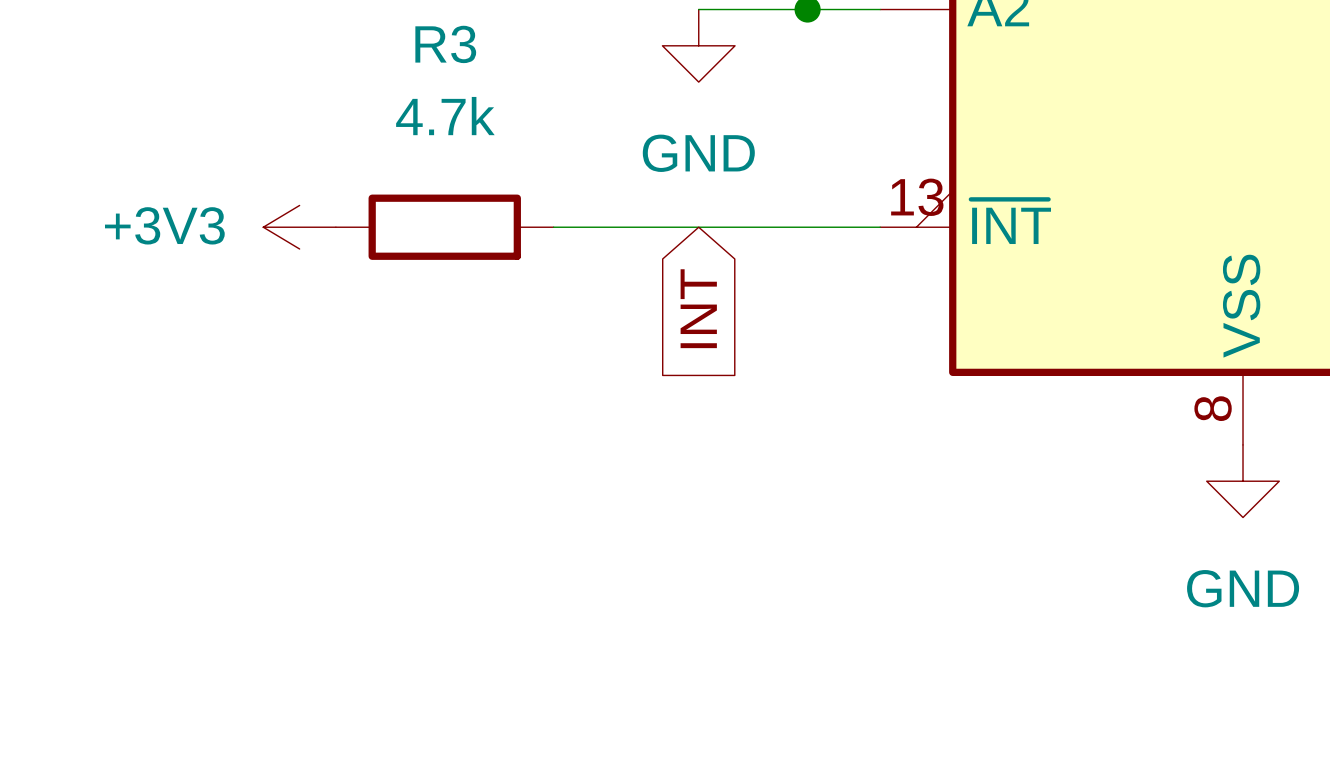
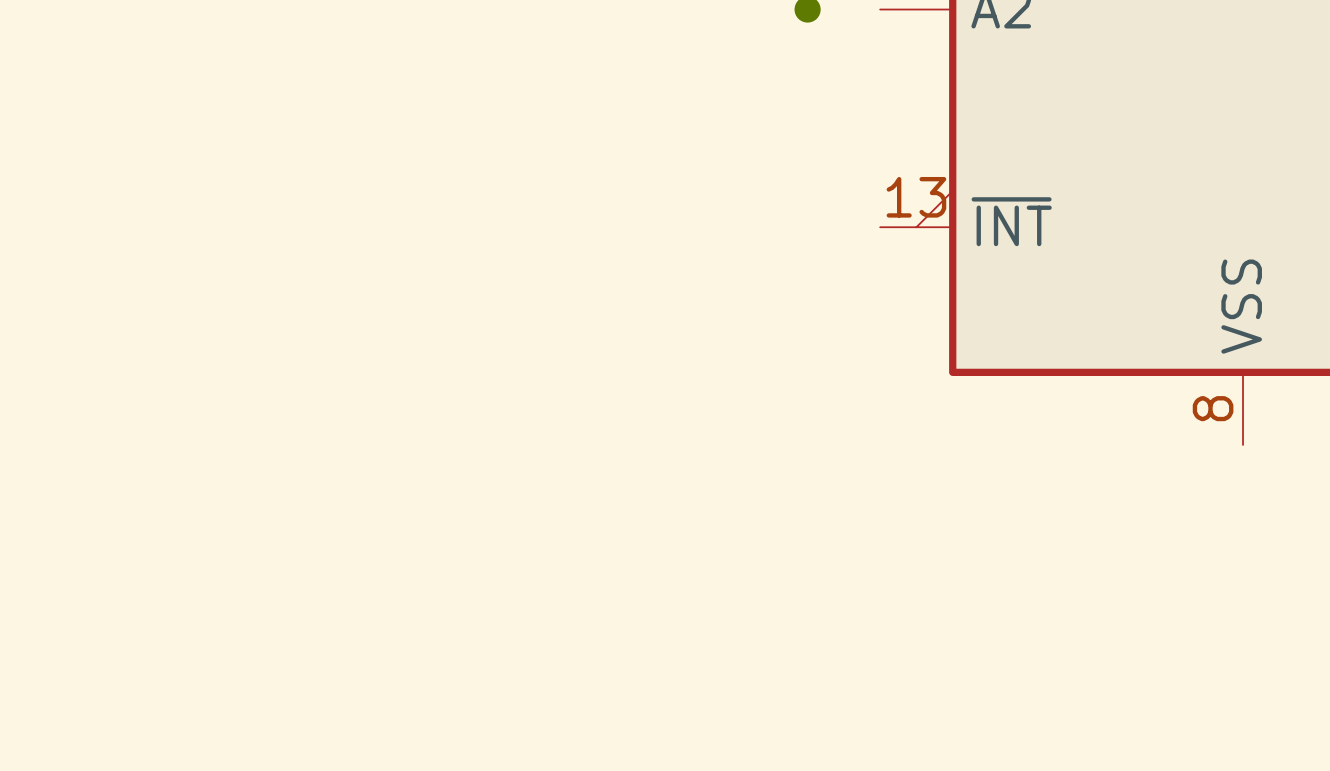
wire: (698, 9) (880, 9) -> none
power symbol: GND (698, 45) -> none
power symbol: +3V3 (299, 227) -> none
R3: 4.7k (444, 227) -> none
wire: (553, 227) (880, 227) -> none
global label: INT (698, 308) -> none
power symbol: GND (1243, 481) -> none

